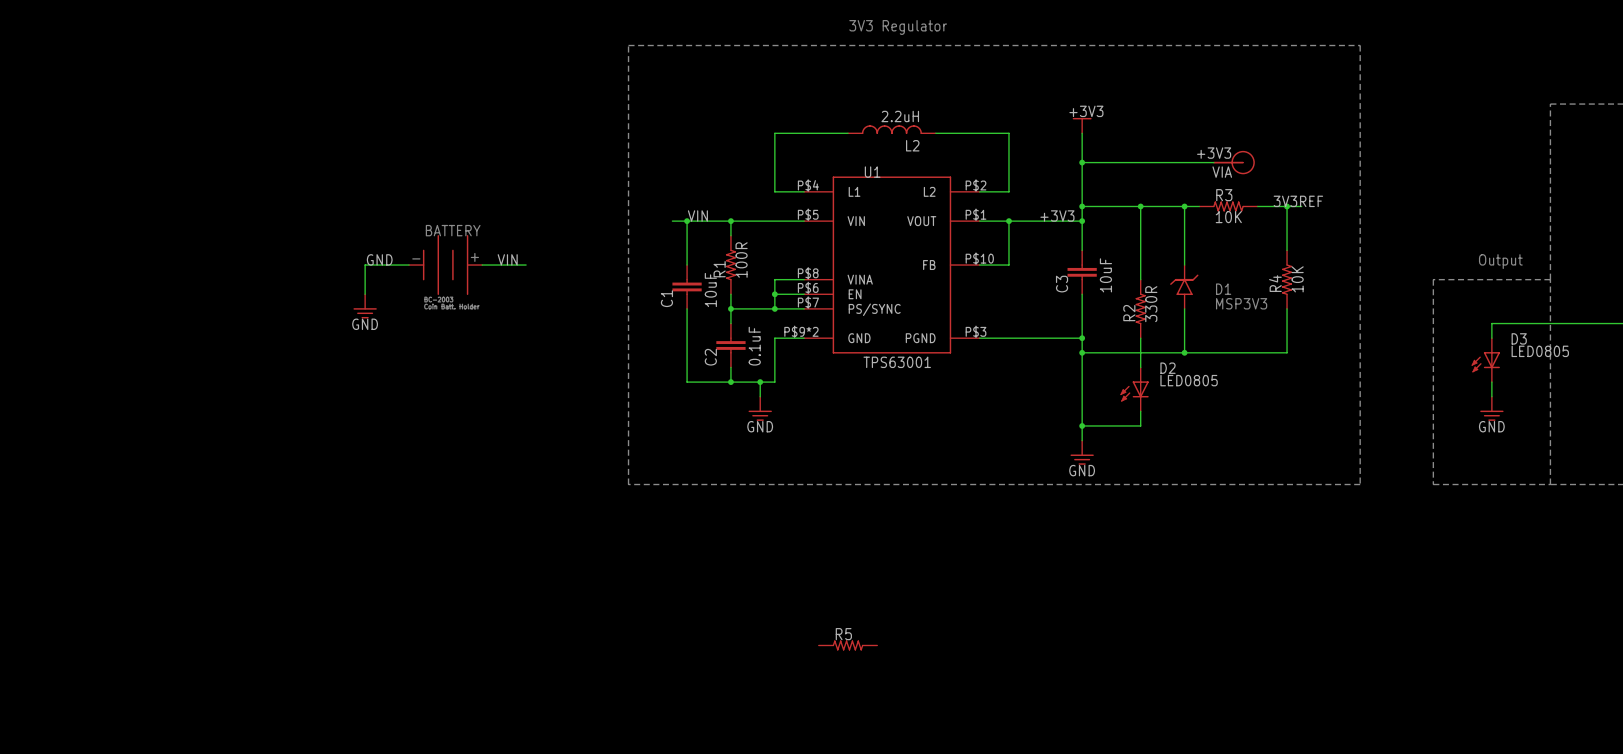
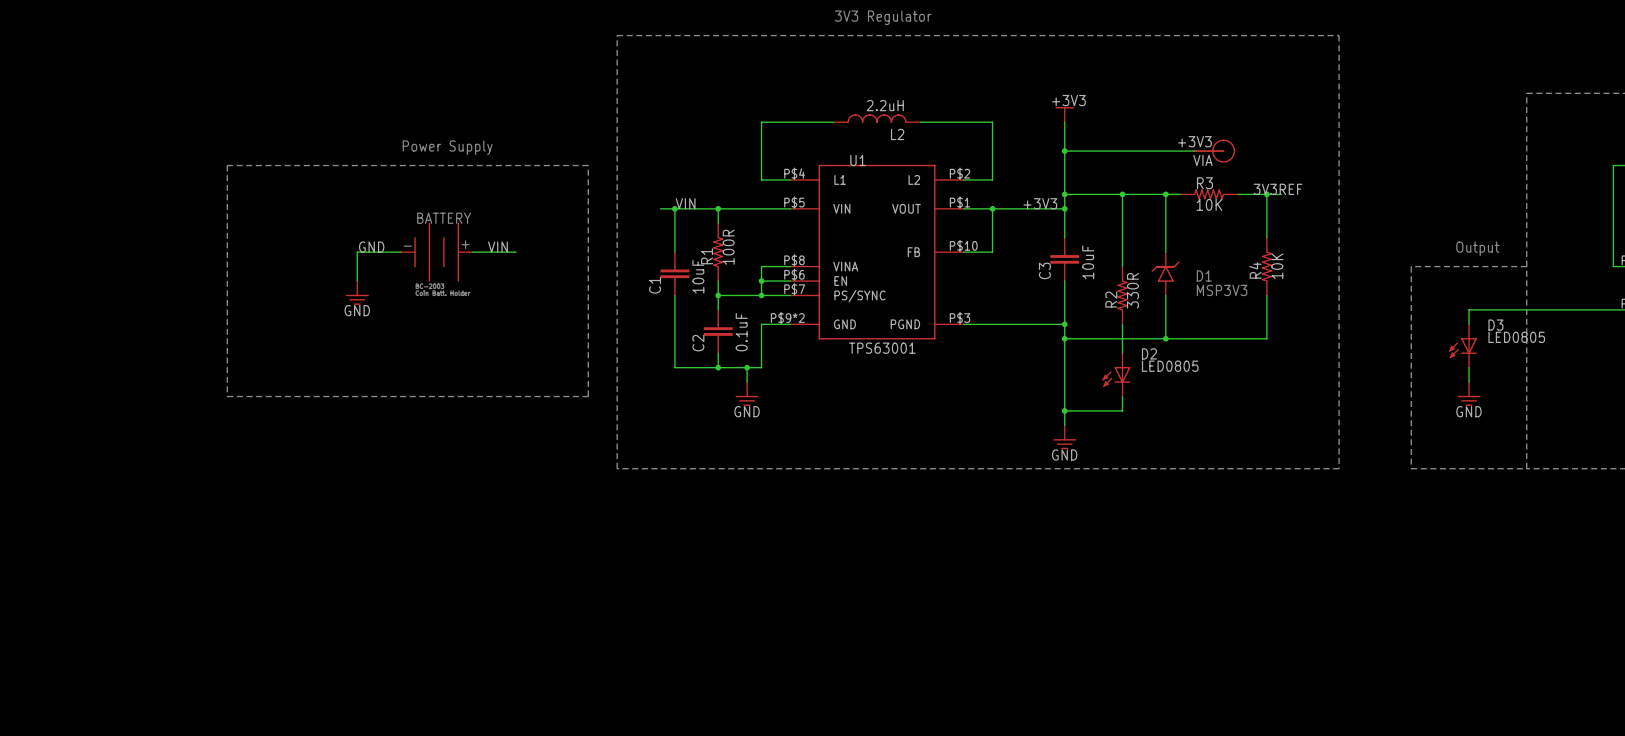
text: none -> Power Supply (447, 147)
line: none -> (227, 165) (227, 396) (588, 396) (588, 165) (227, 165)
R5: (848, 645) -> none

